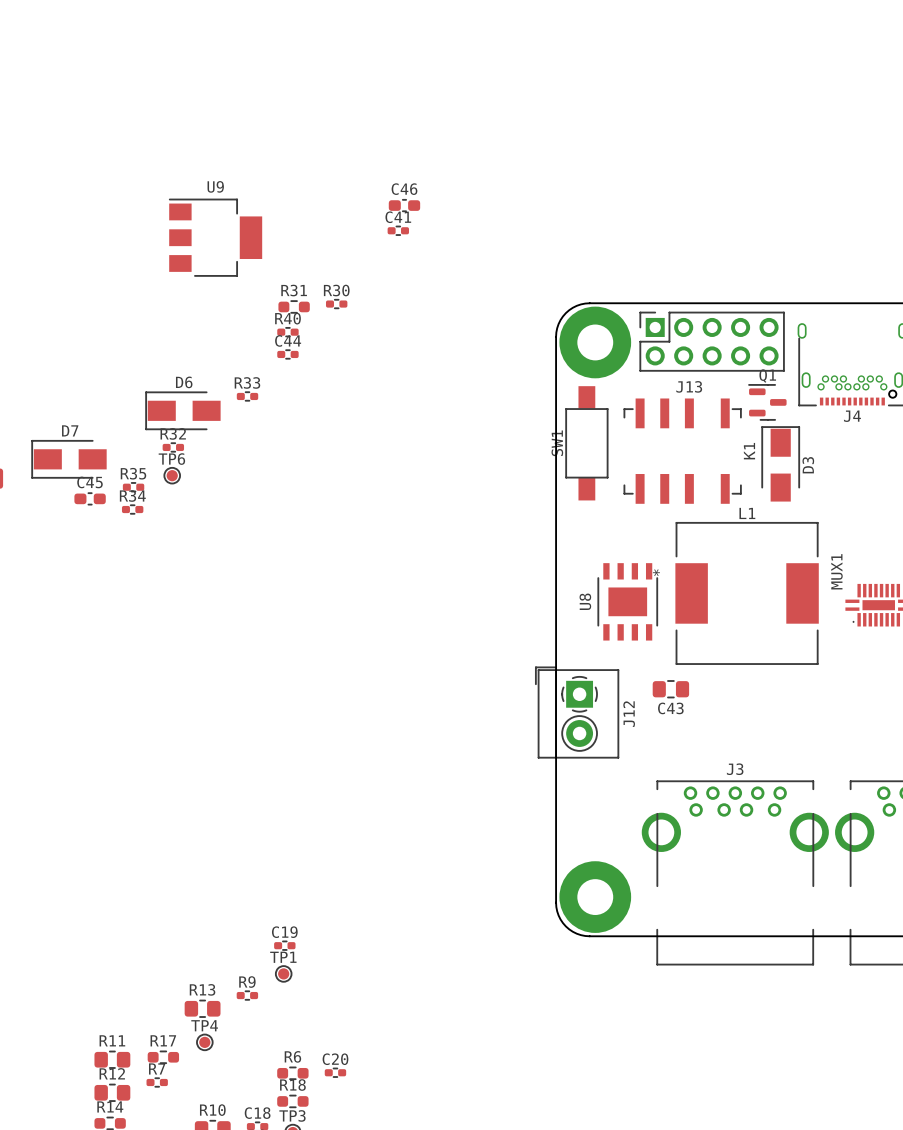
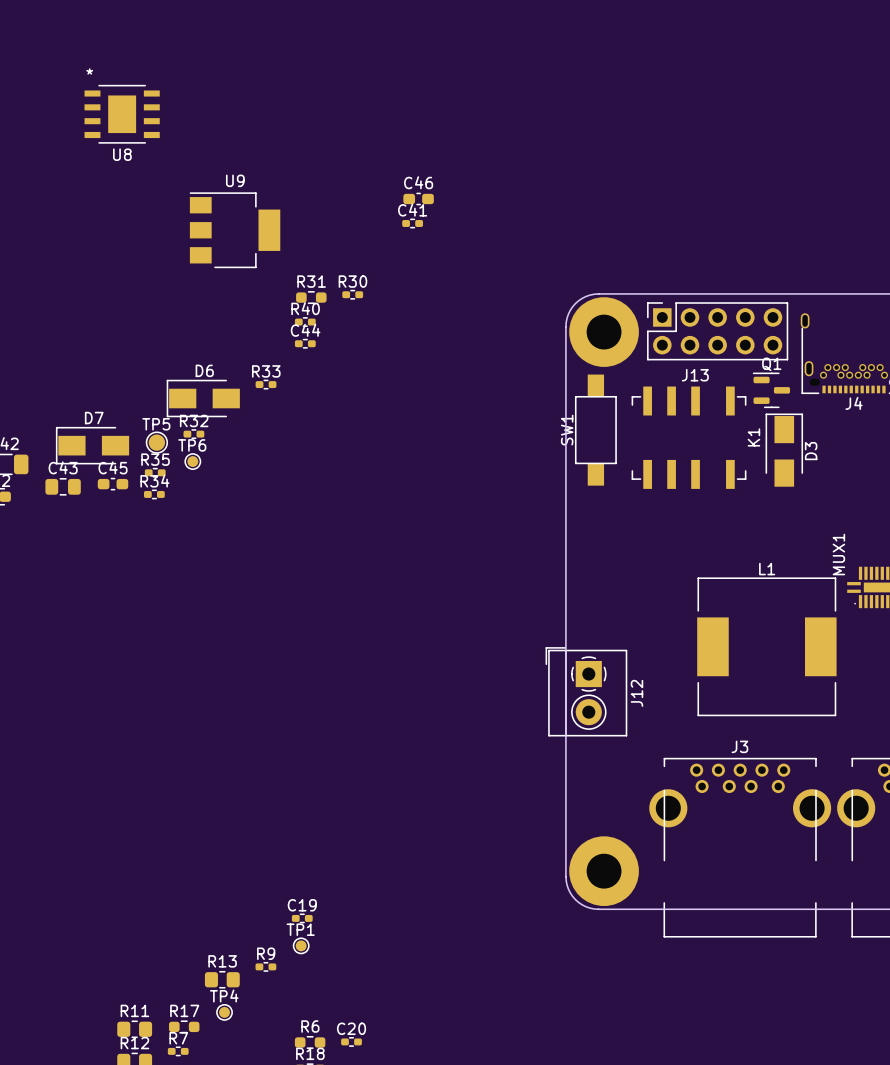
TP5: none -> (156, 442)
U8 footprint: [597, 563, 658, 641] -> [84, 84, 160, 144]
L1 position: (747, 593) -> (766, 646)
U8 name position: U8 (585, 601) -> U8 (122, 154)
C43 position: (670, 689) -> (63, 486)
C43 name position: C43 (670, 708) -> C43 (63, 467)

